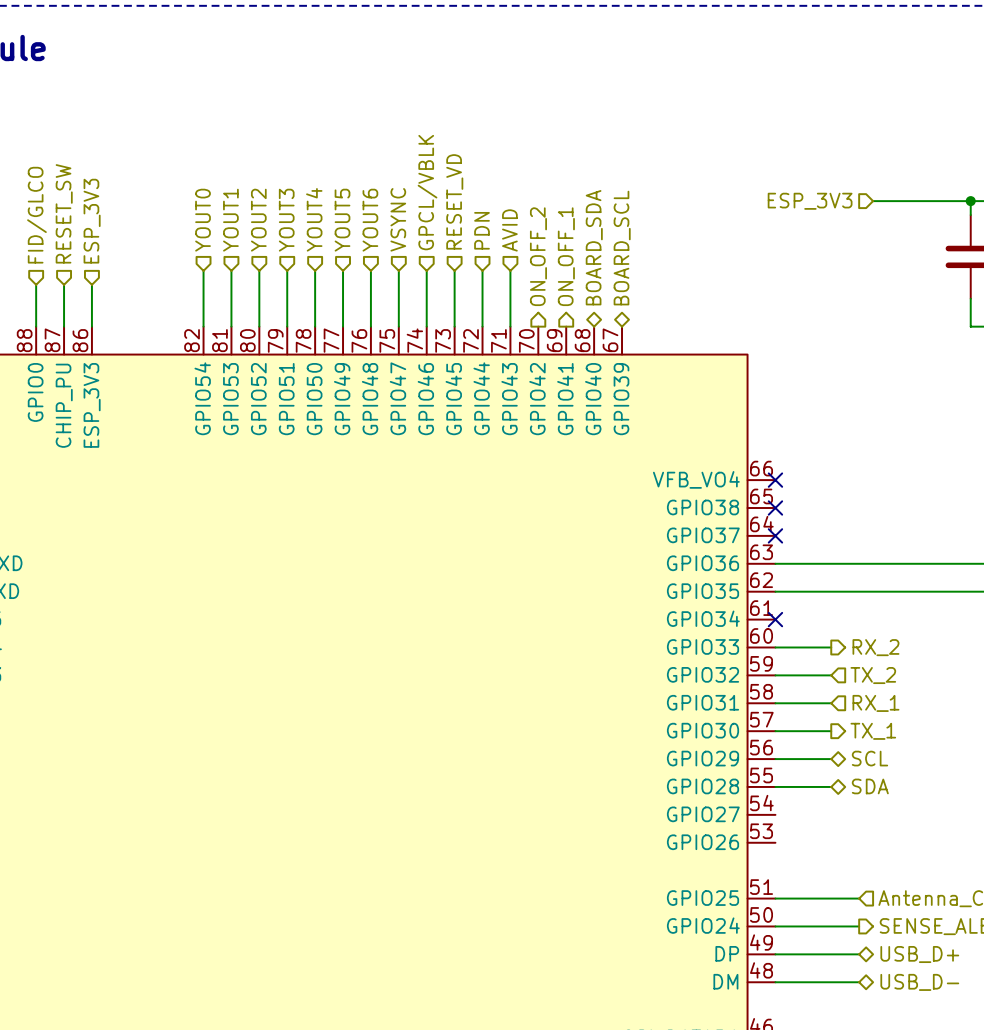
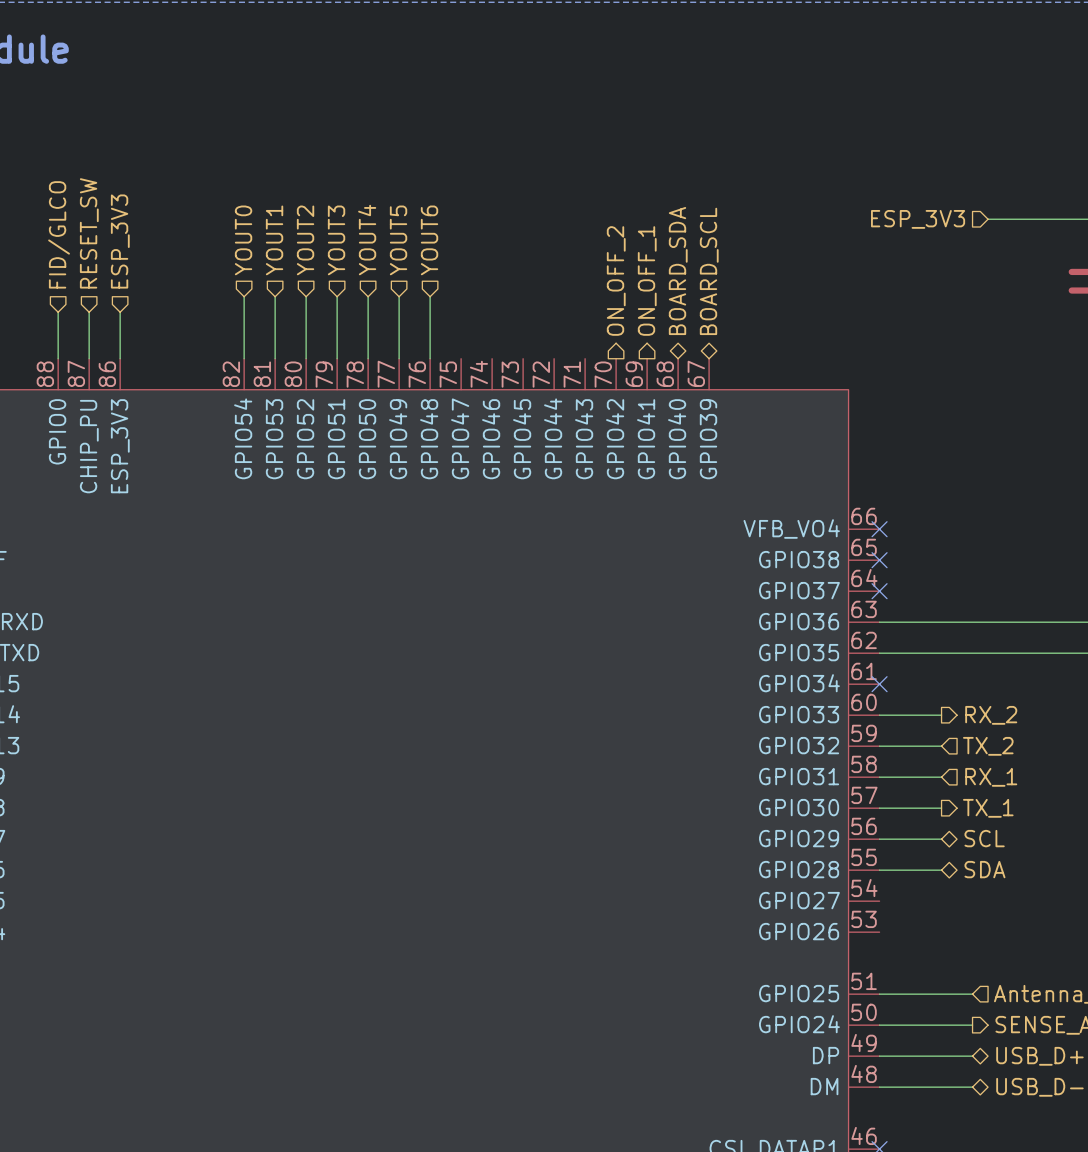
hierarchical label: GPCL/VBLK (427, 192) -> none
hierarchical label: RESET_VD (454, 201) -> none
hierarchical label: VSYNC (398, 219) -> none
hierarchical label: PDN (482, 230) -> none
hierarchical label: AVID (509, 230) -> none
wire: (398, 270) (398, 326) -> none
wire: (426, 270) (426, 326) -> none
wire: (454, 270) (454, 326) -> none
wire: (482, 270) (482, 326) -> none
wire: (510, 270) (510, 326) -> none

